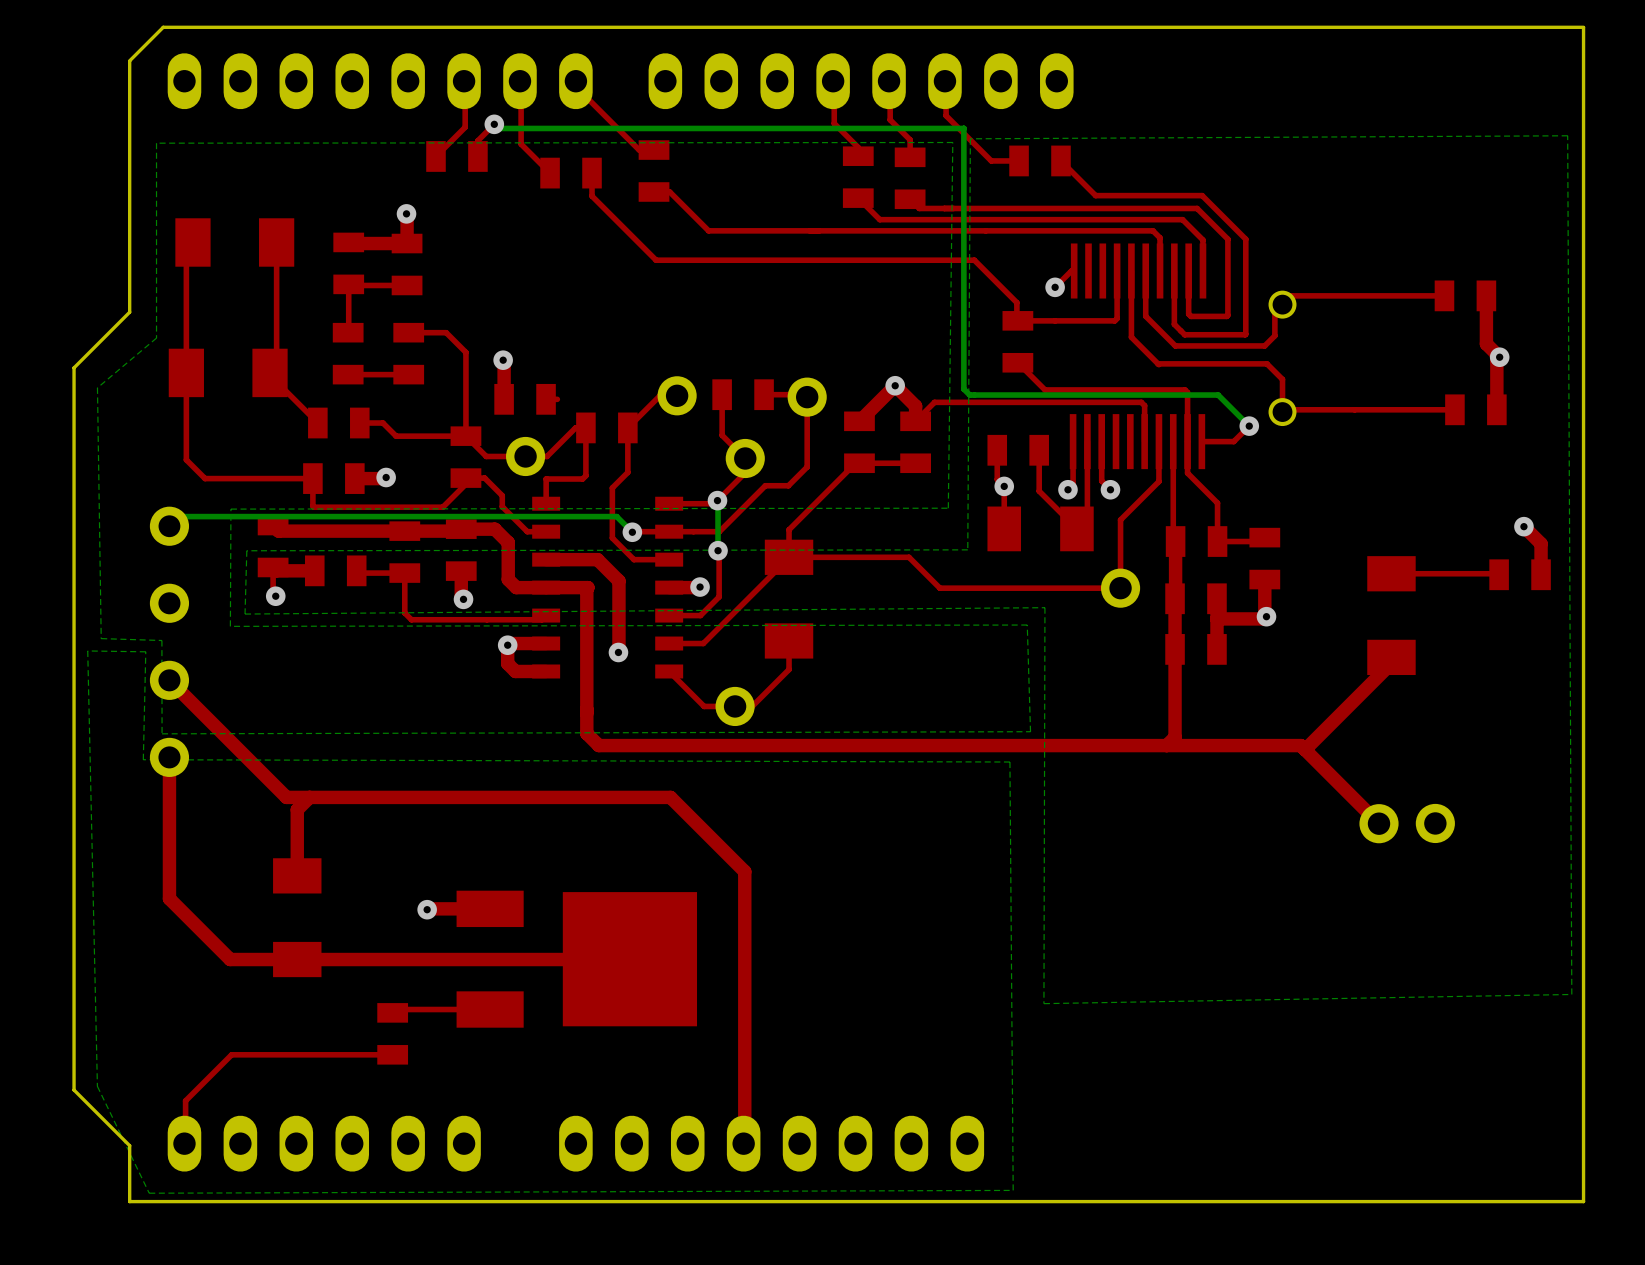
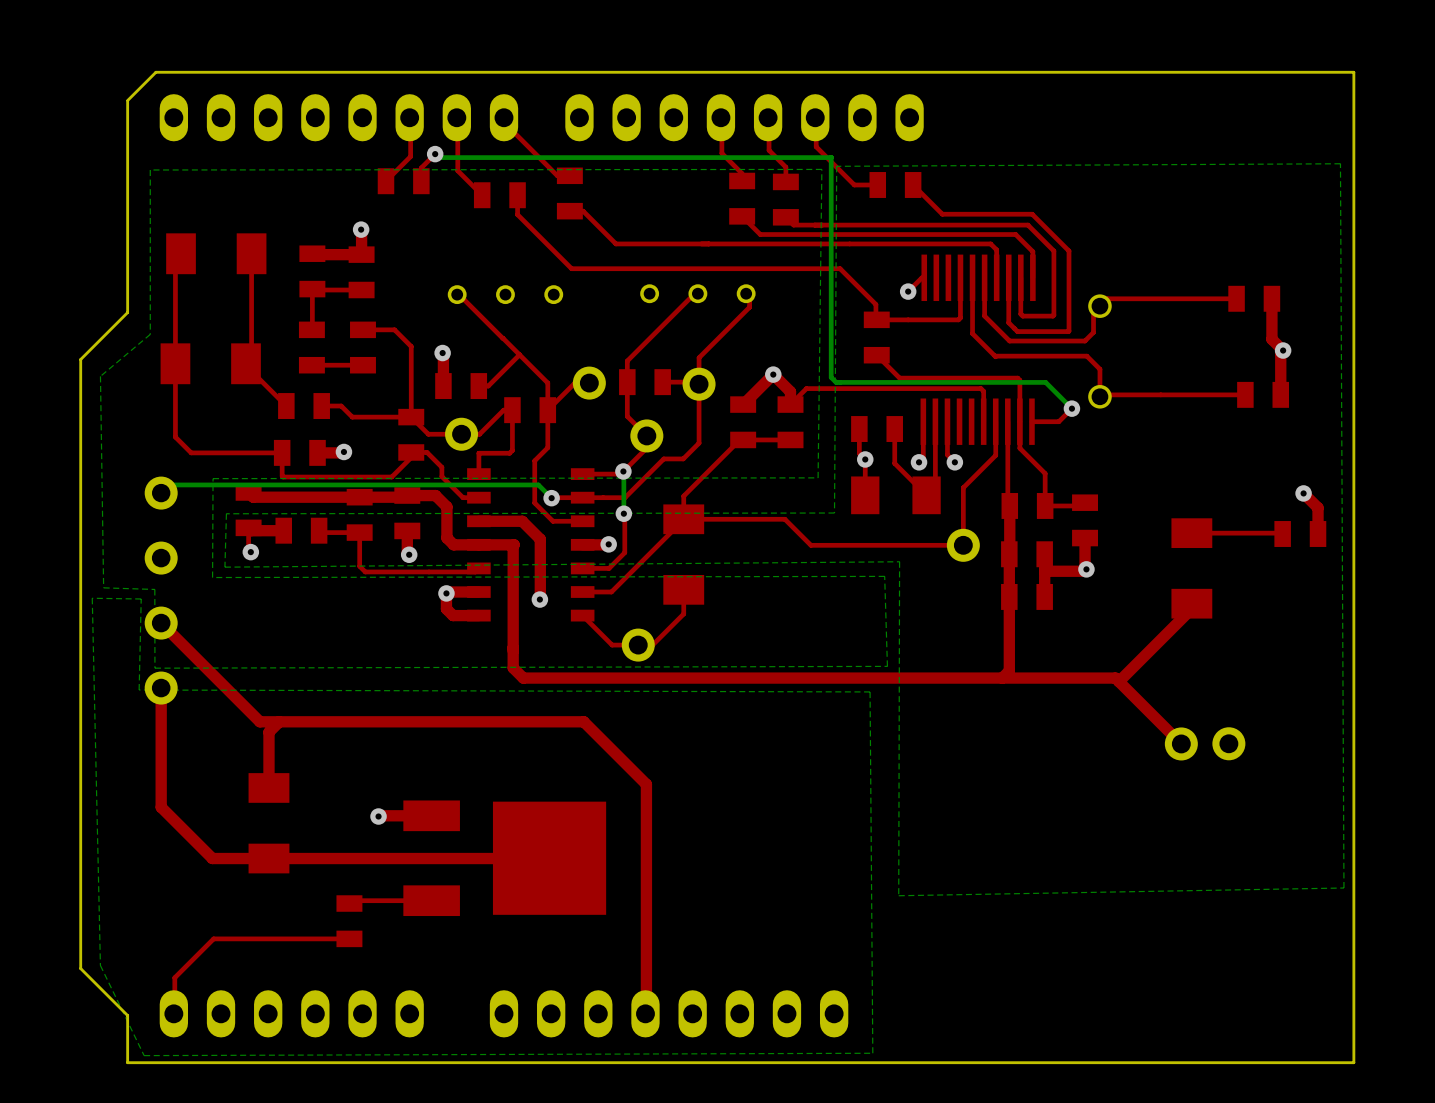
top track: none -> (701, 292) (696, 292) (627, 361) (627, 382)
top track: none -> (749, 292) (749, 307) (699, 357) (699, 384)
part: none -> (697, 293)
part: none -> (505, 294)
top track: none -> (463, 298) (502, 338)
top track: none -> (503, 338) (547, 383) (547, 410)
top track: none -> (519, 354) (488, 386)

